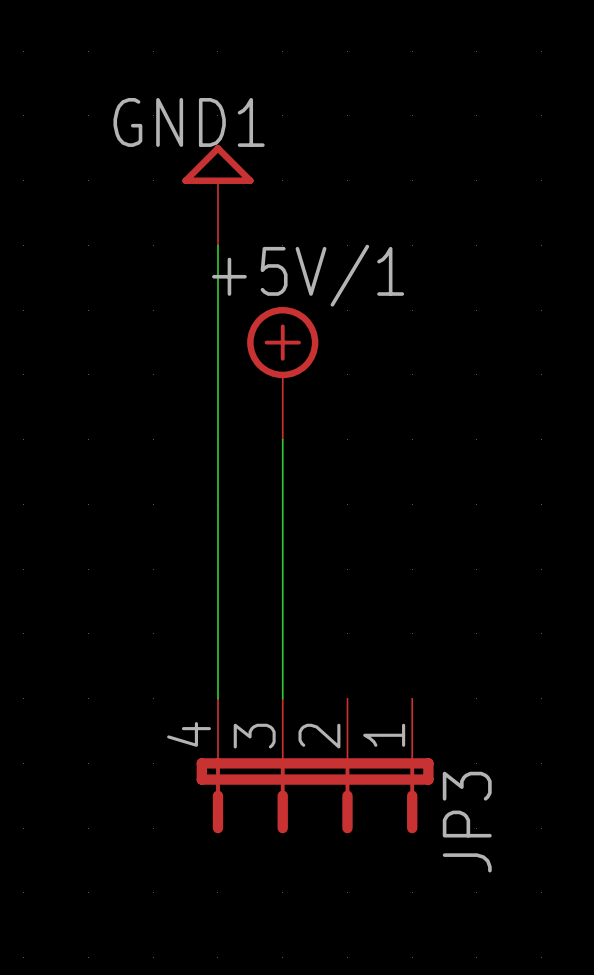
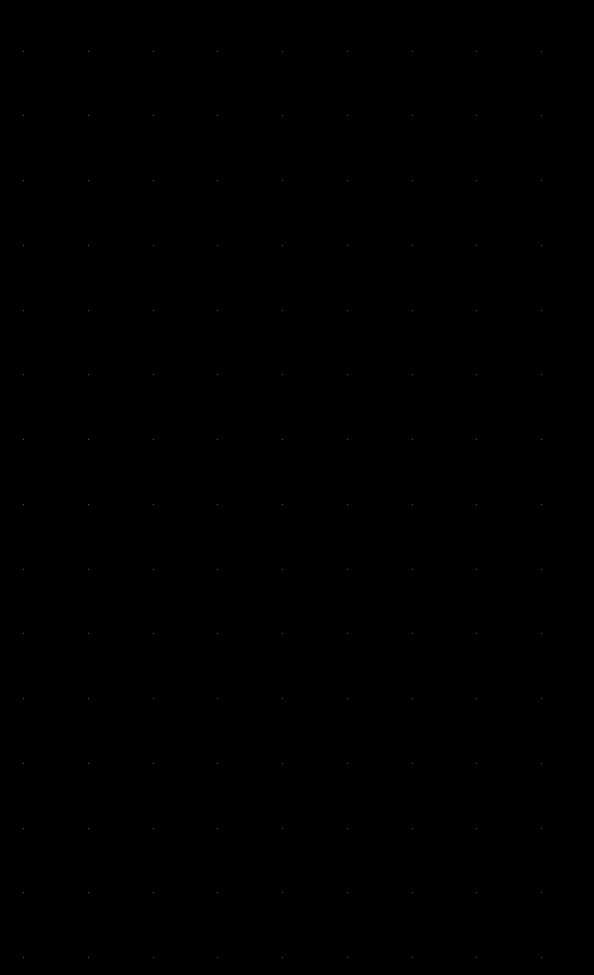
power symbol: GND1 (217, 195) -> none
wire: (217, 245) (217, 698) -> none
power symbol: +5V/1 (282, 373) -> none
wire: (282, 439) (282, 698) -> none
JP3: (315, 765) -> none

